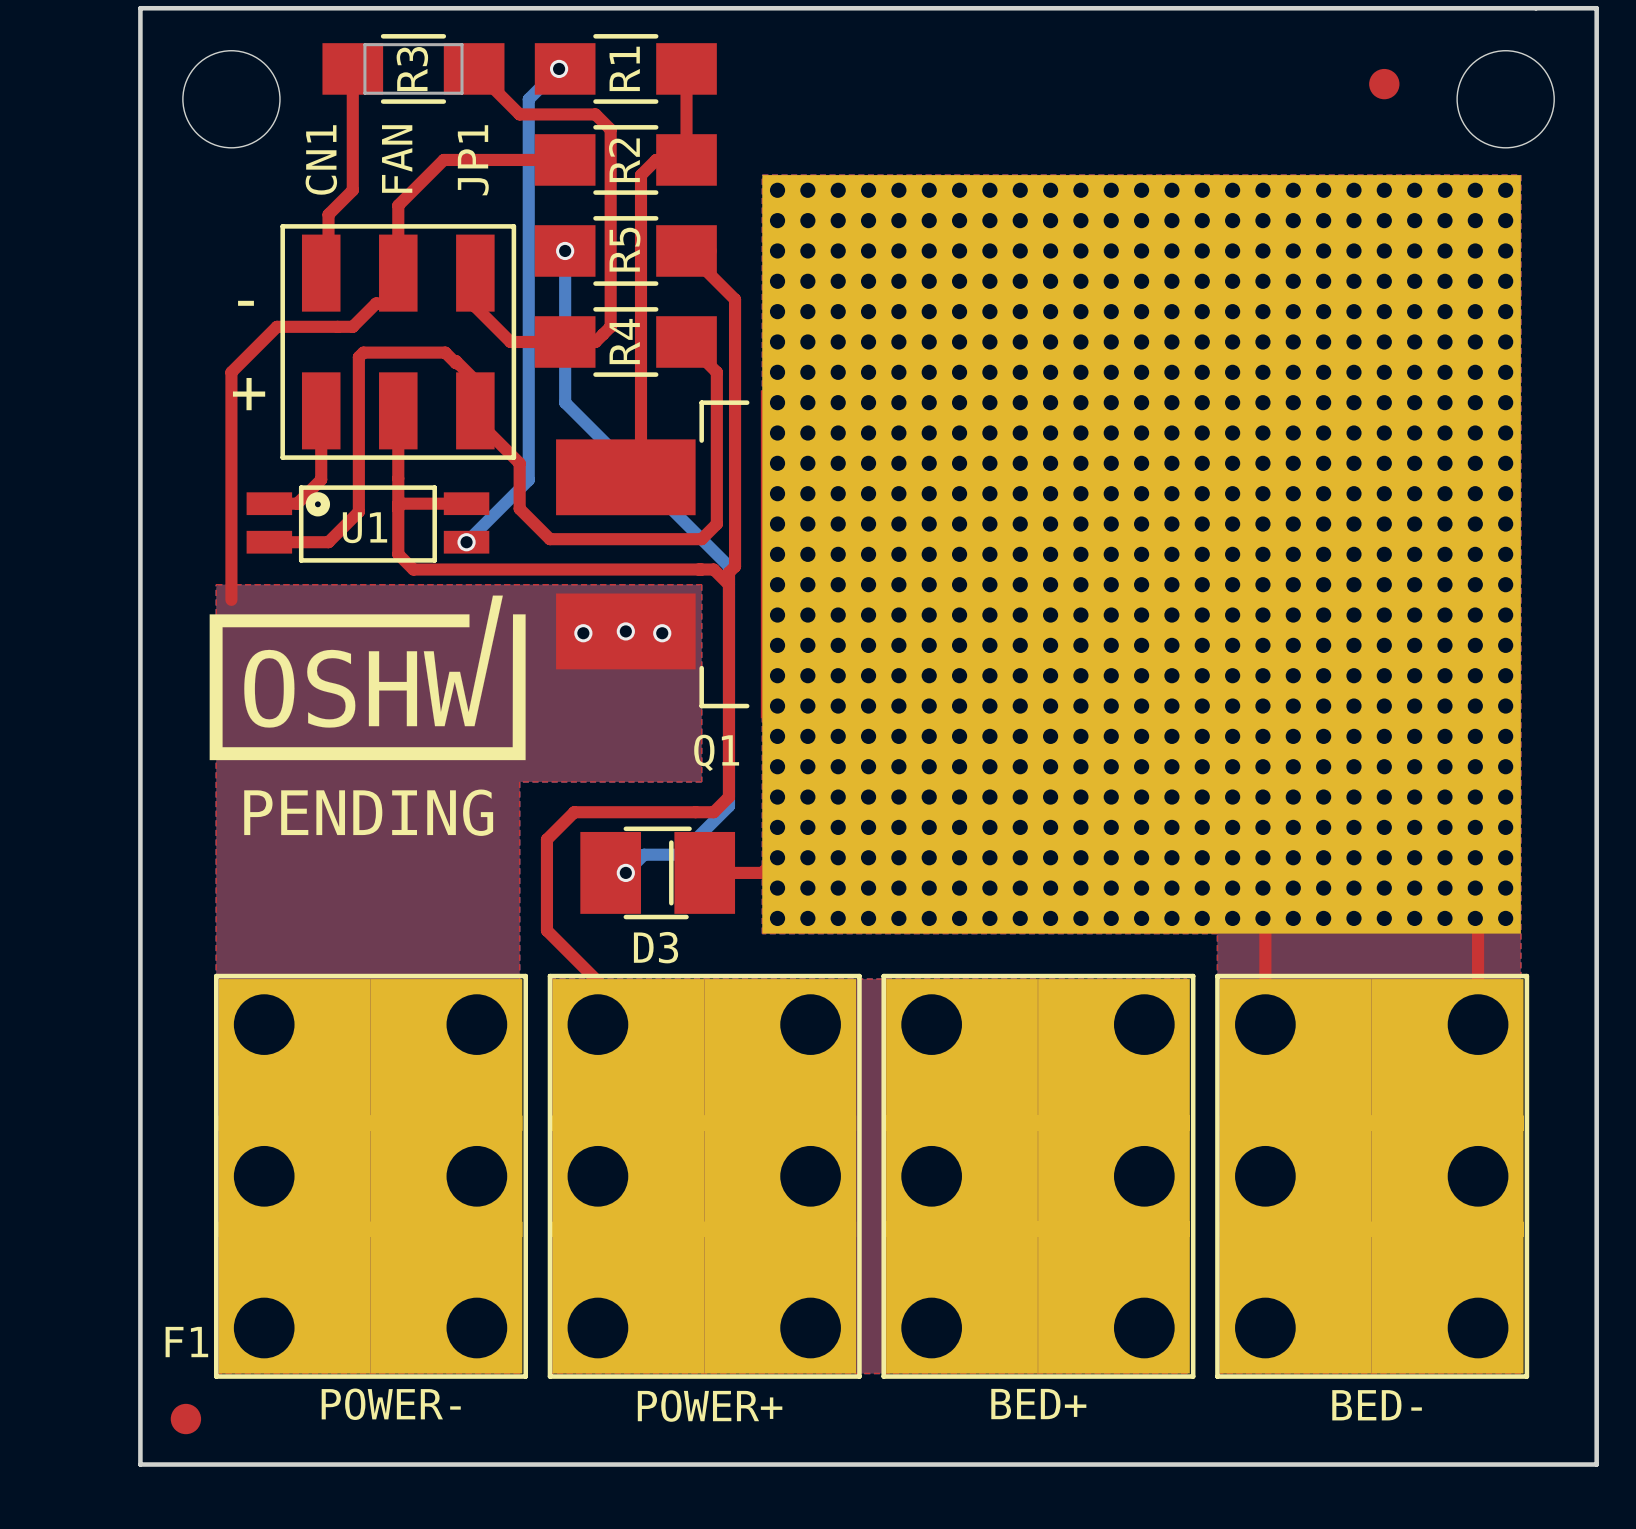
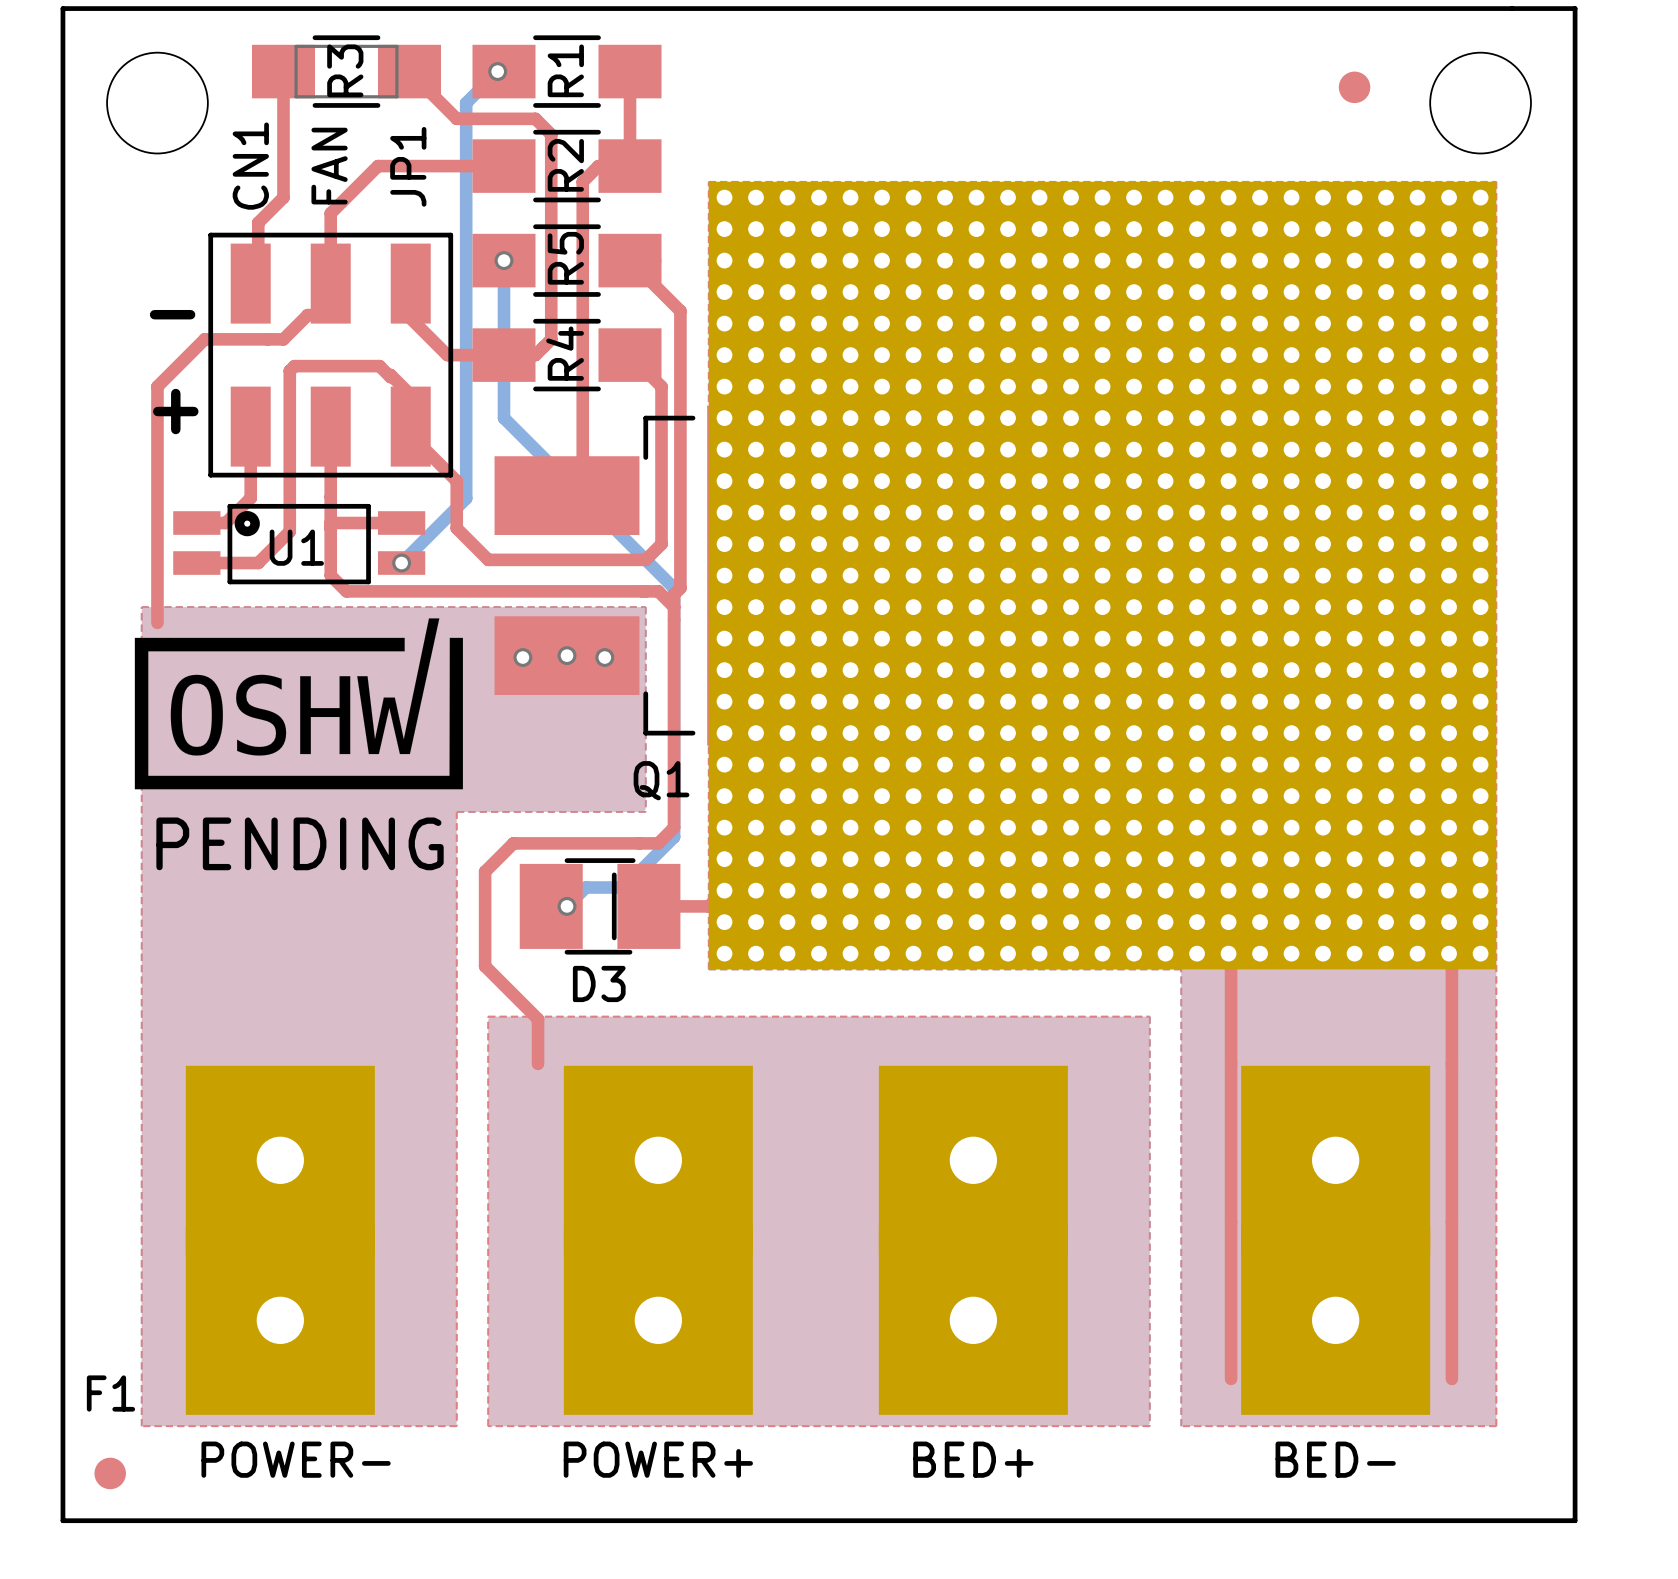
POWER- footprint: [213, 973, 528, 1379] -> [185, 1065, 375, 1415]
POWER+ footprint: [547, 973, 862, 1379] -> [563, 1065, 753, 1415]
BED+ footprint: [881, 973, 1196, 1379] -> [878, 1065, 1068, 1415]
BED- footprint: [1215, 973, 1530, 1379] -> [1241, 1065, 1431, 1415]

